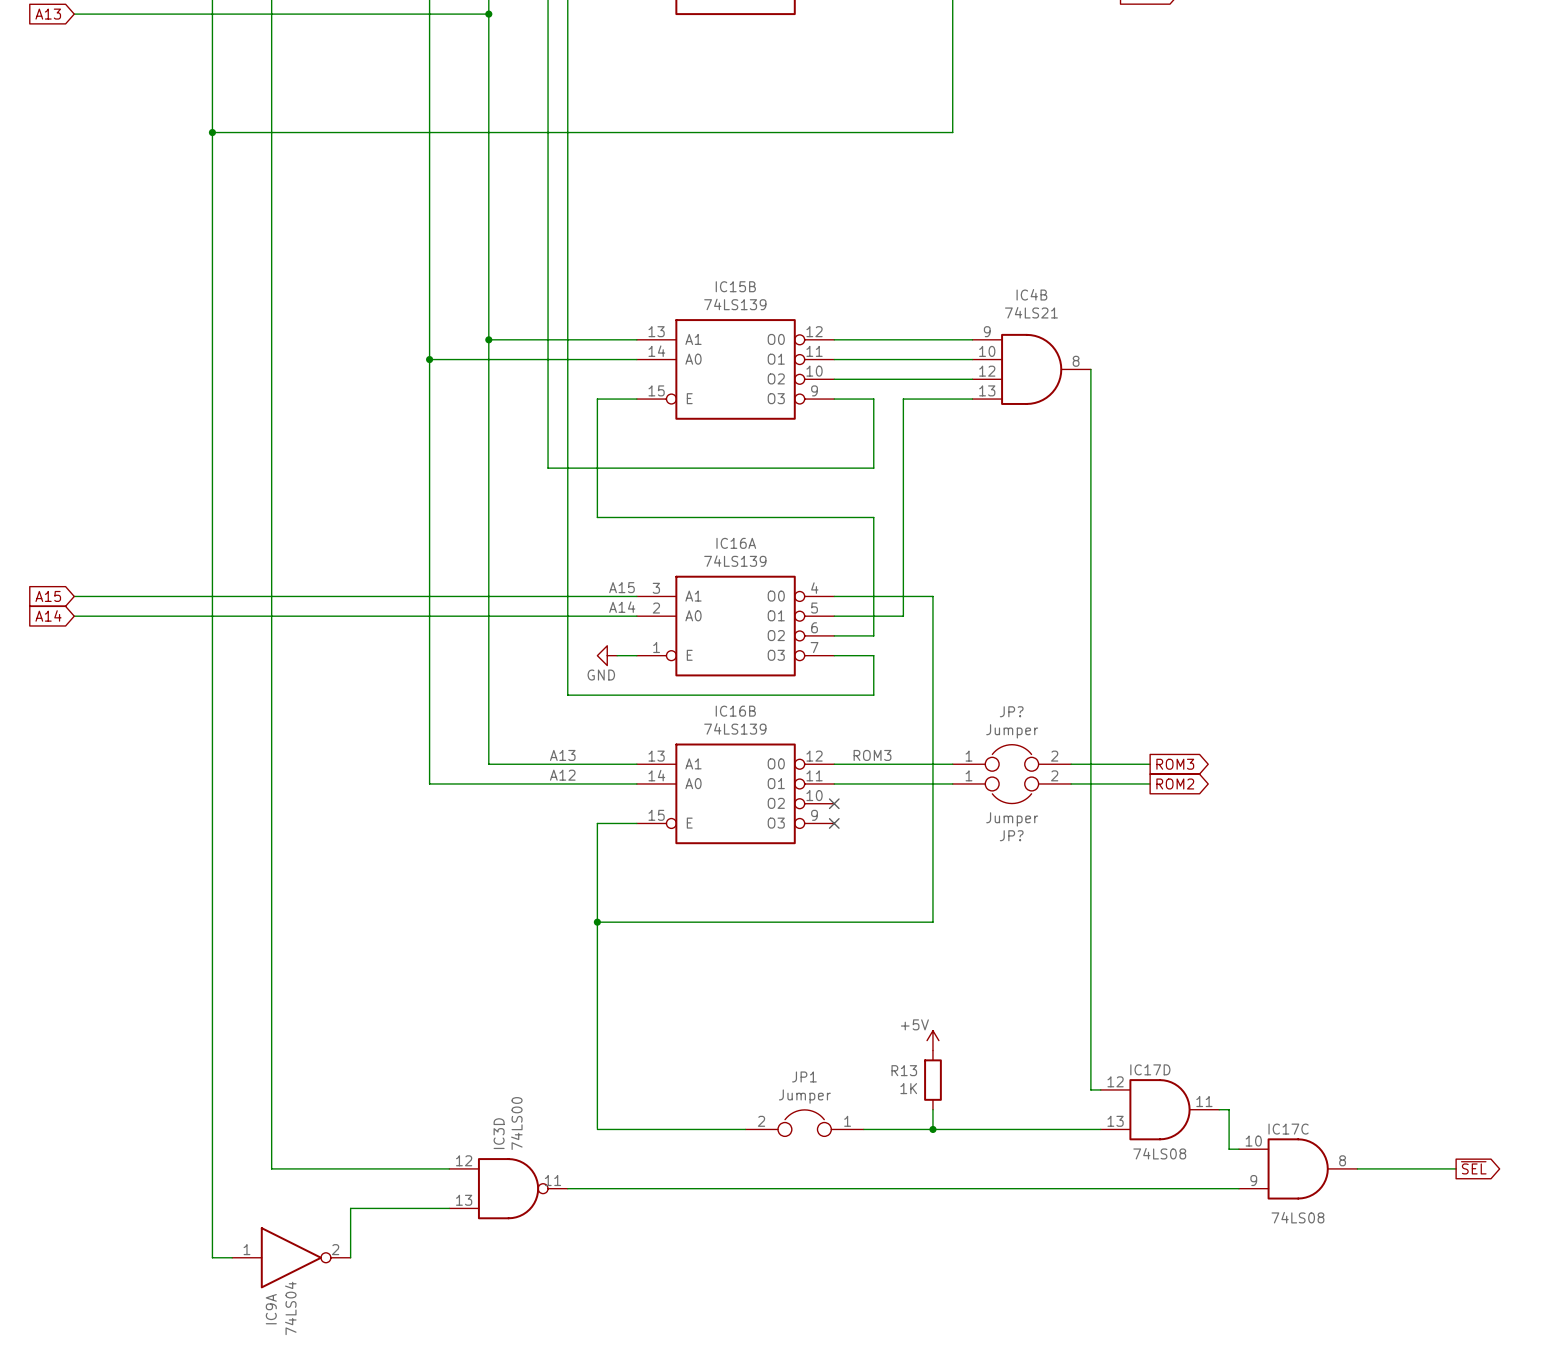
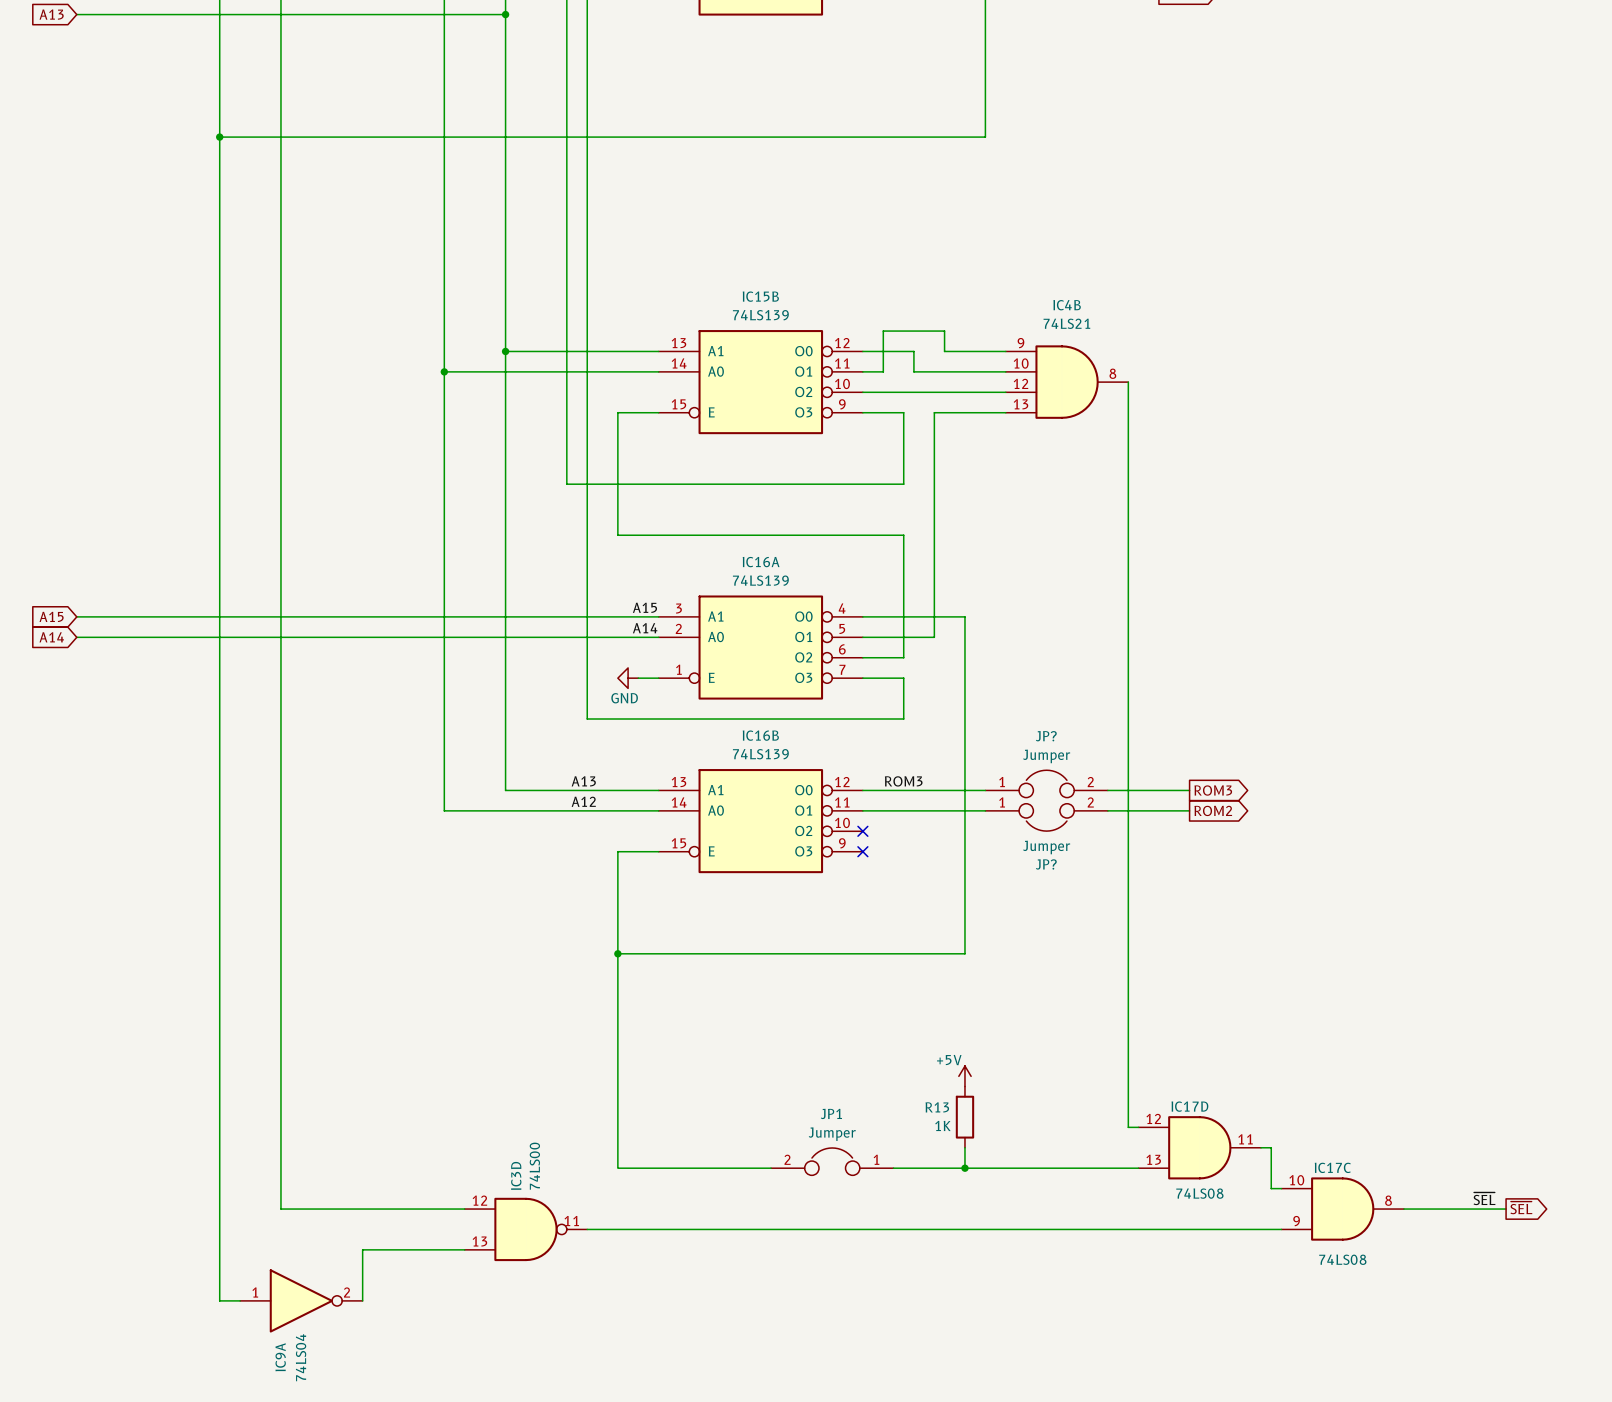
wire: (883, 339) (913, 339) -> (913, 351) (913, 371)
wire: (854, 359) (883, 359) -> (883, 371) (883, 331) (944, 331) (944, 351)
label: none -> ~{SEL} (1484, 1198)

